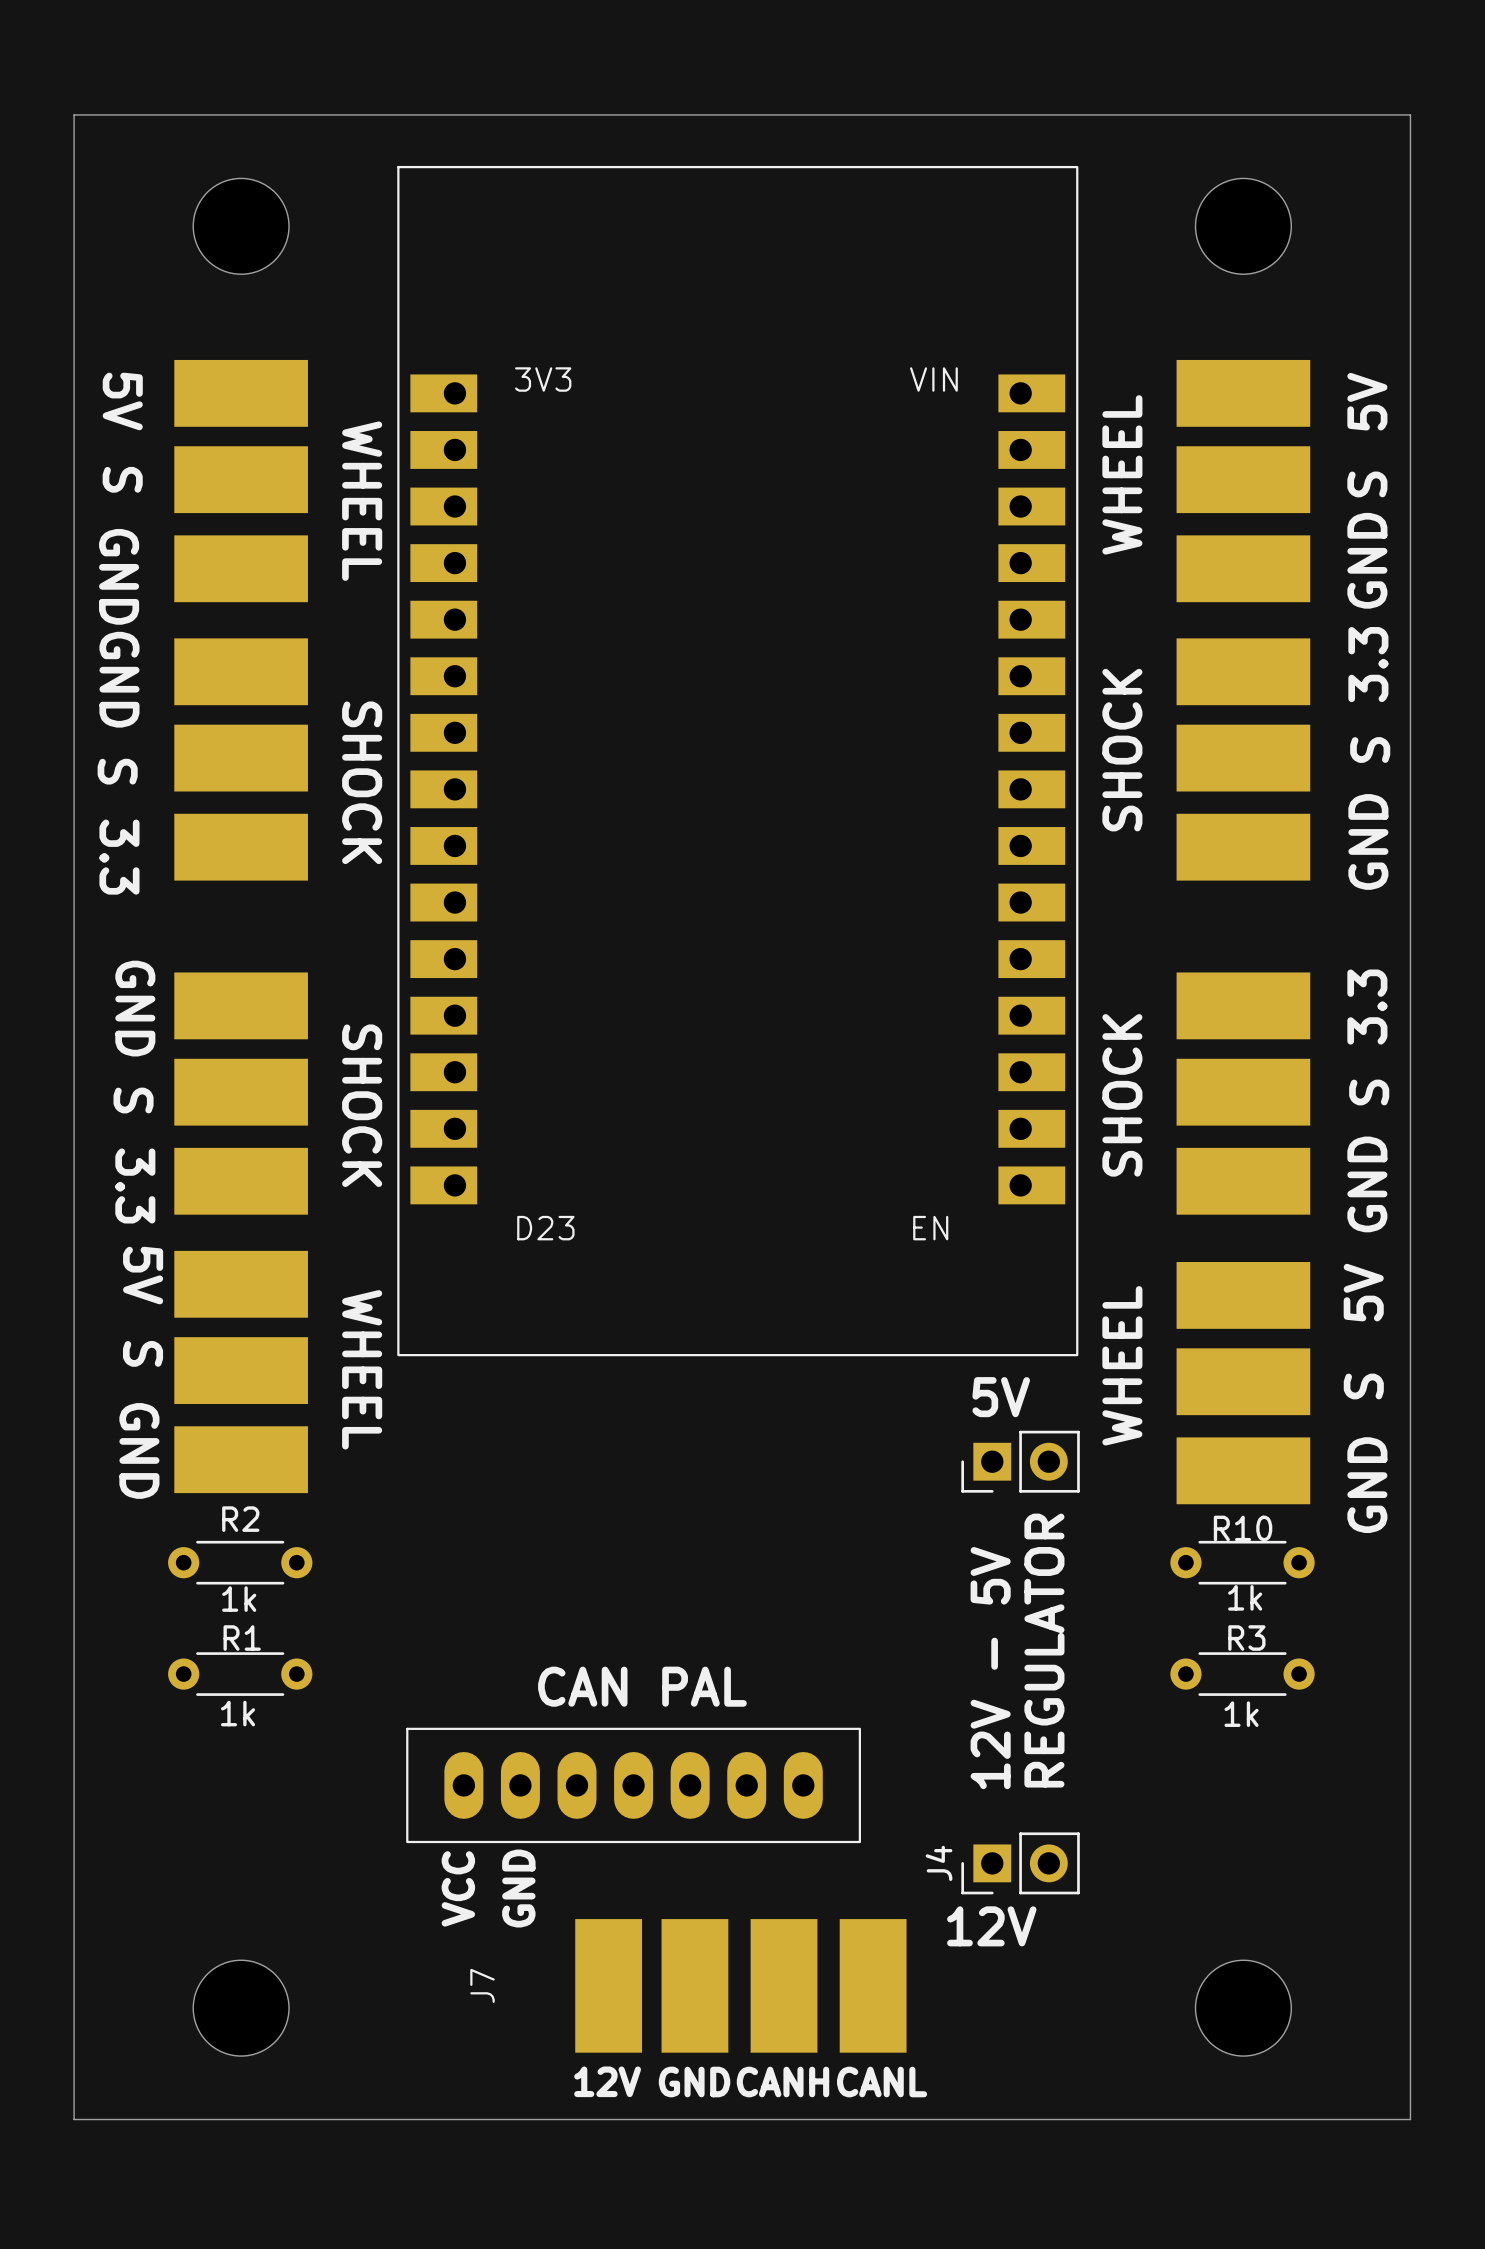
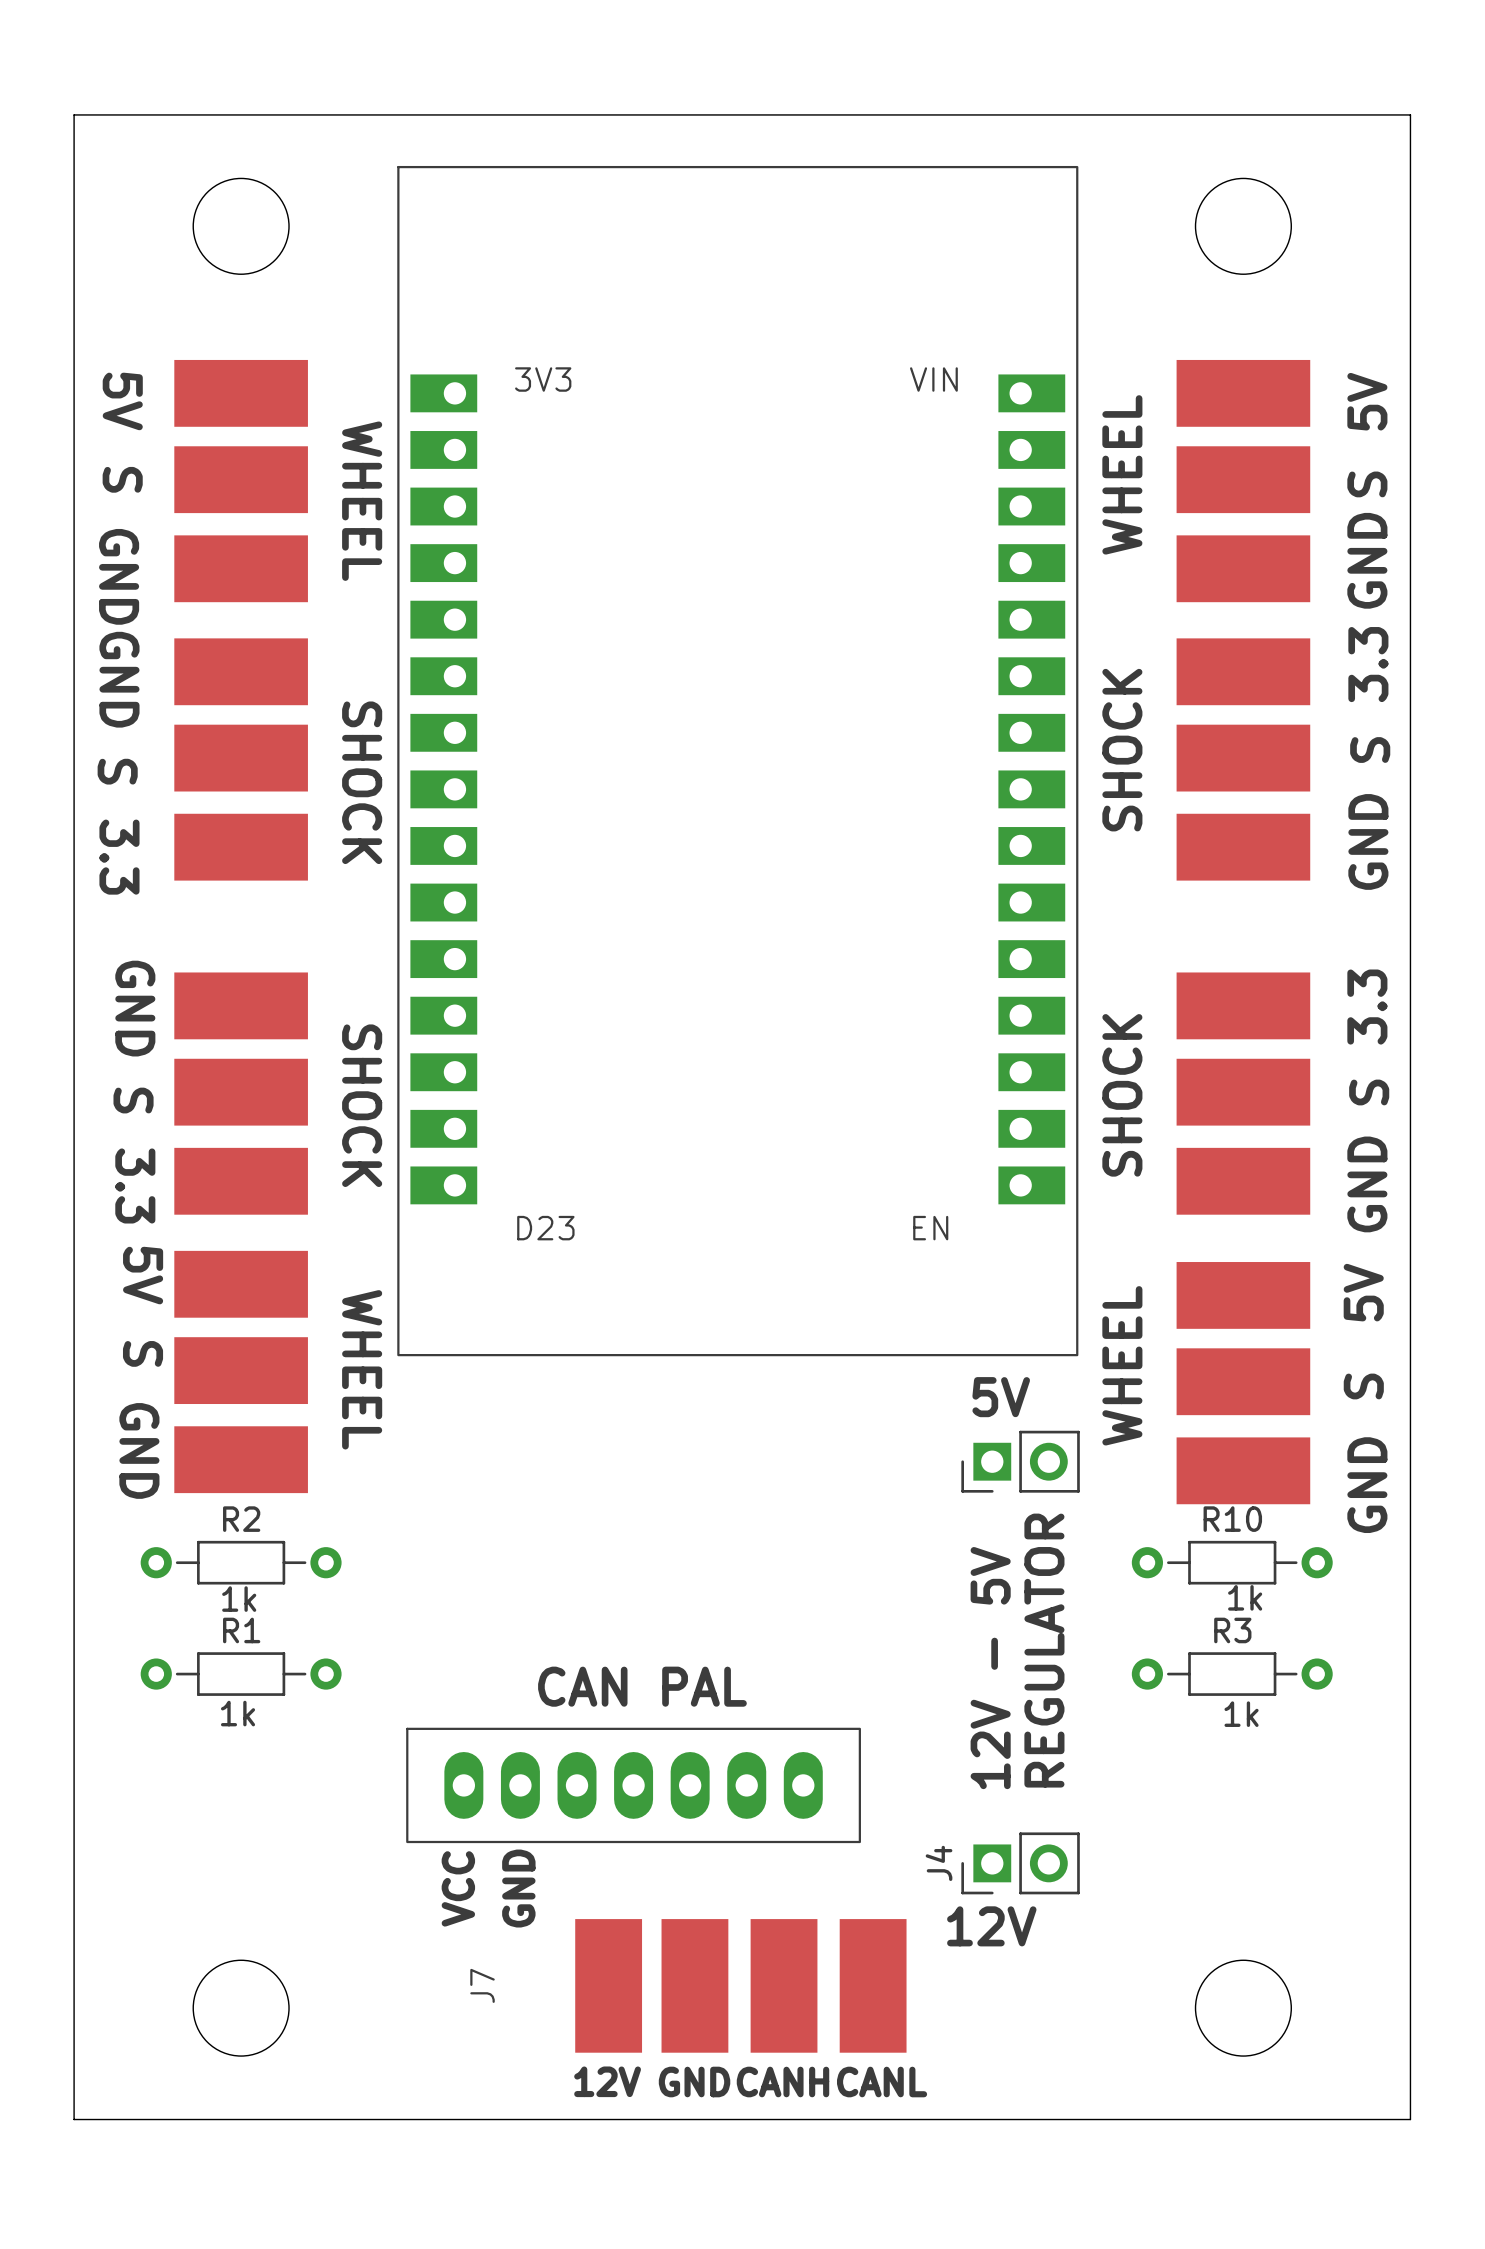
R2 footprint: [168, 1540, 313, 1585] -> [140, 1540, 342, 1585]
R10 footprint: [1170, 1540, 1315, 1585] -> [1131, 1540, 1333, 1585]
R1 footprint: [168, 1652, 313, 1696] -> [140, 1652, 342, 1696]
R3 footprint: [1170, 1652, 1315, 1696] -> [1131, 1652, 1333, 1696]

